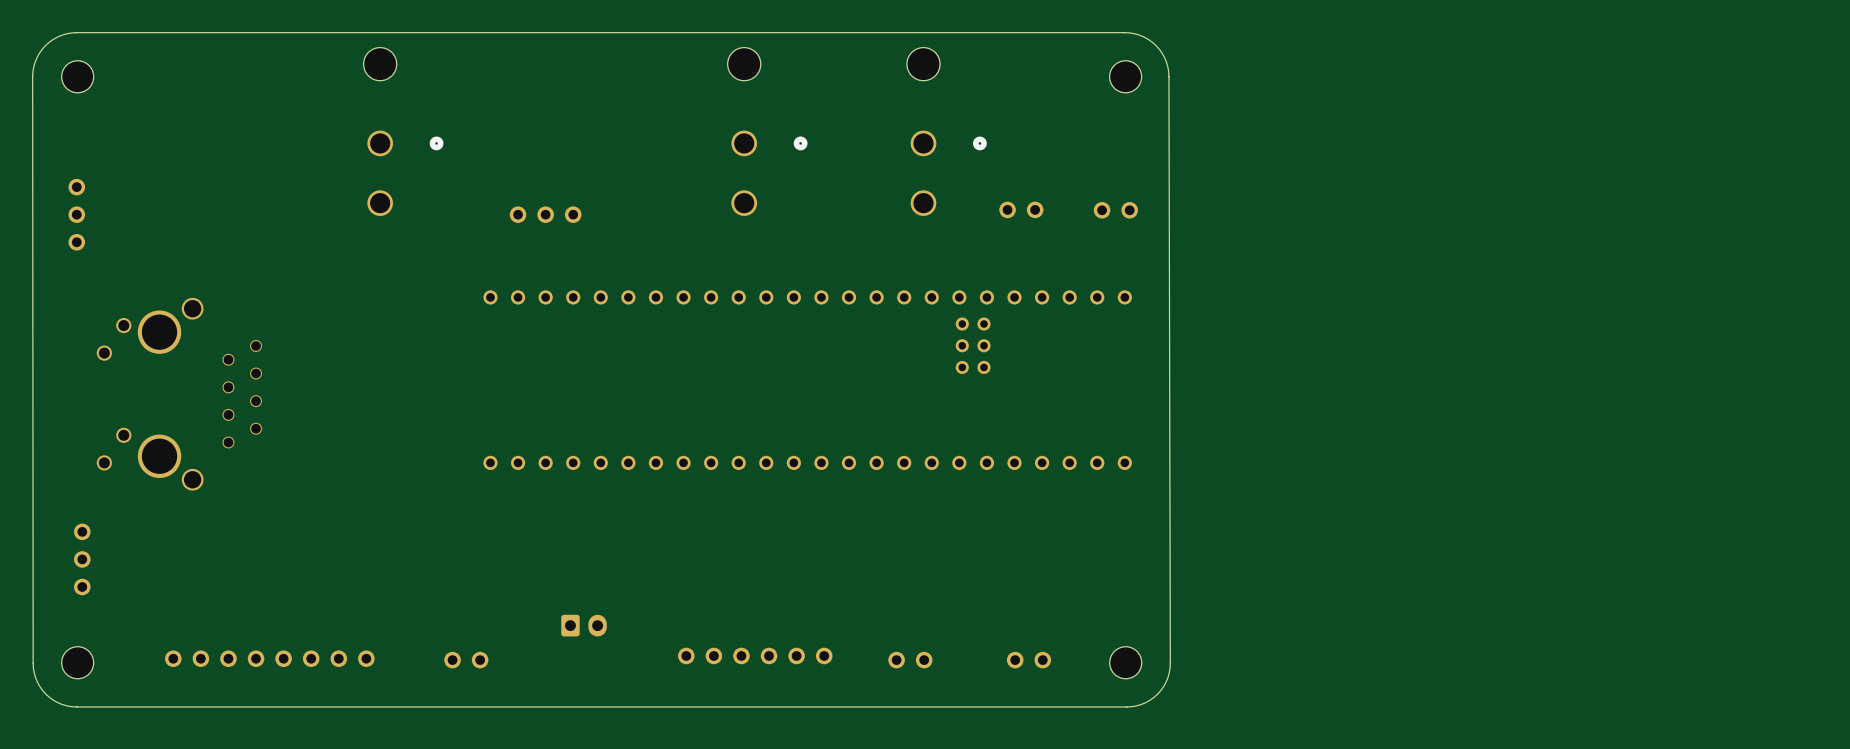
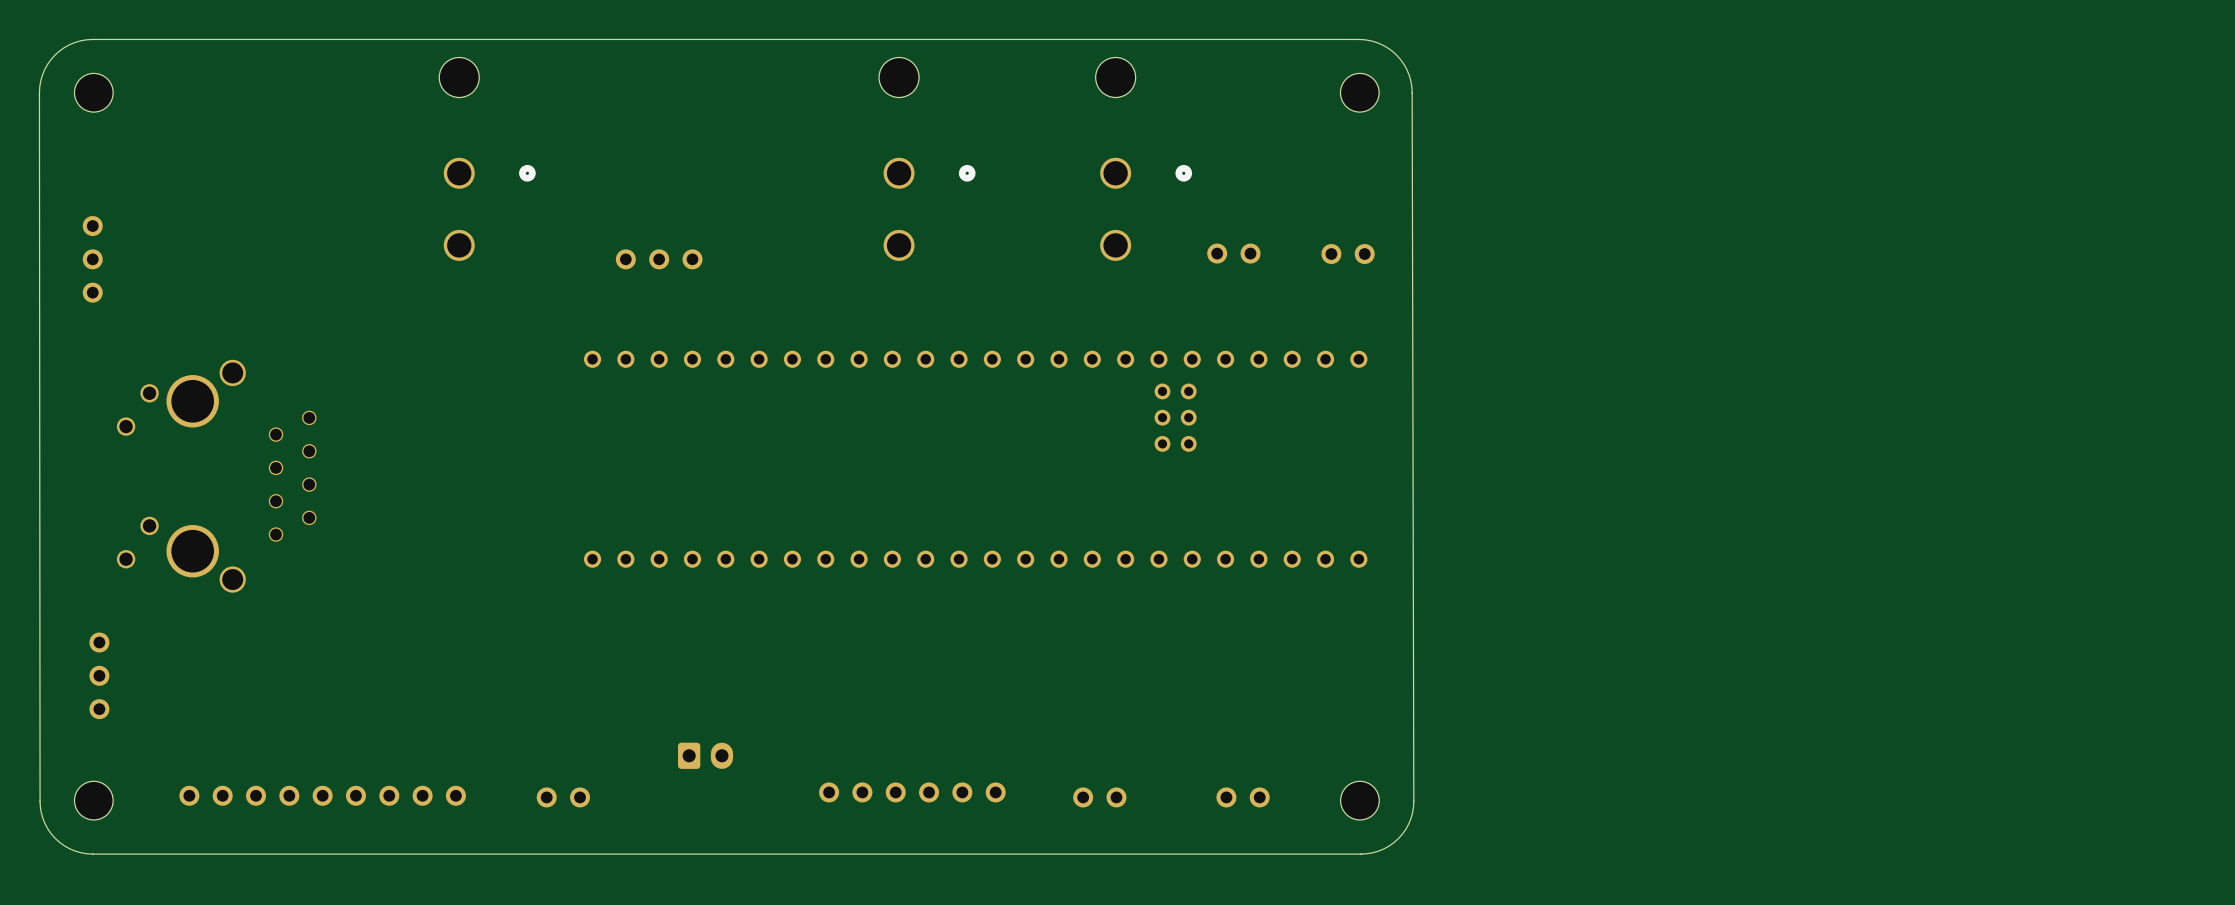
part footprint: [165, 650, 375, 667] -> [179, 785, 466, 806]

